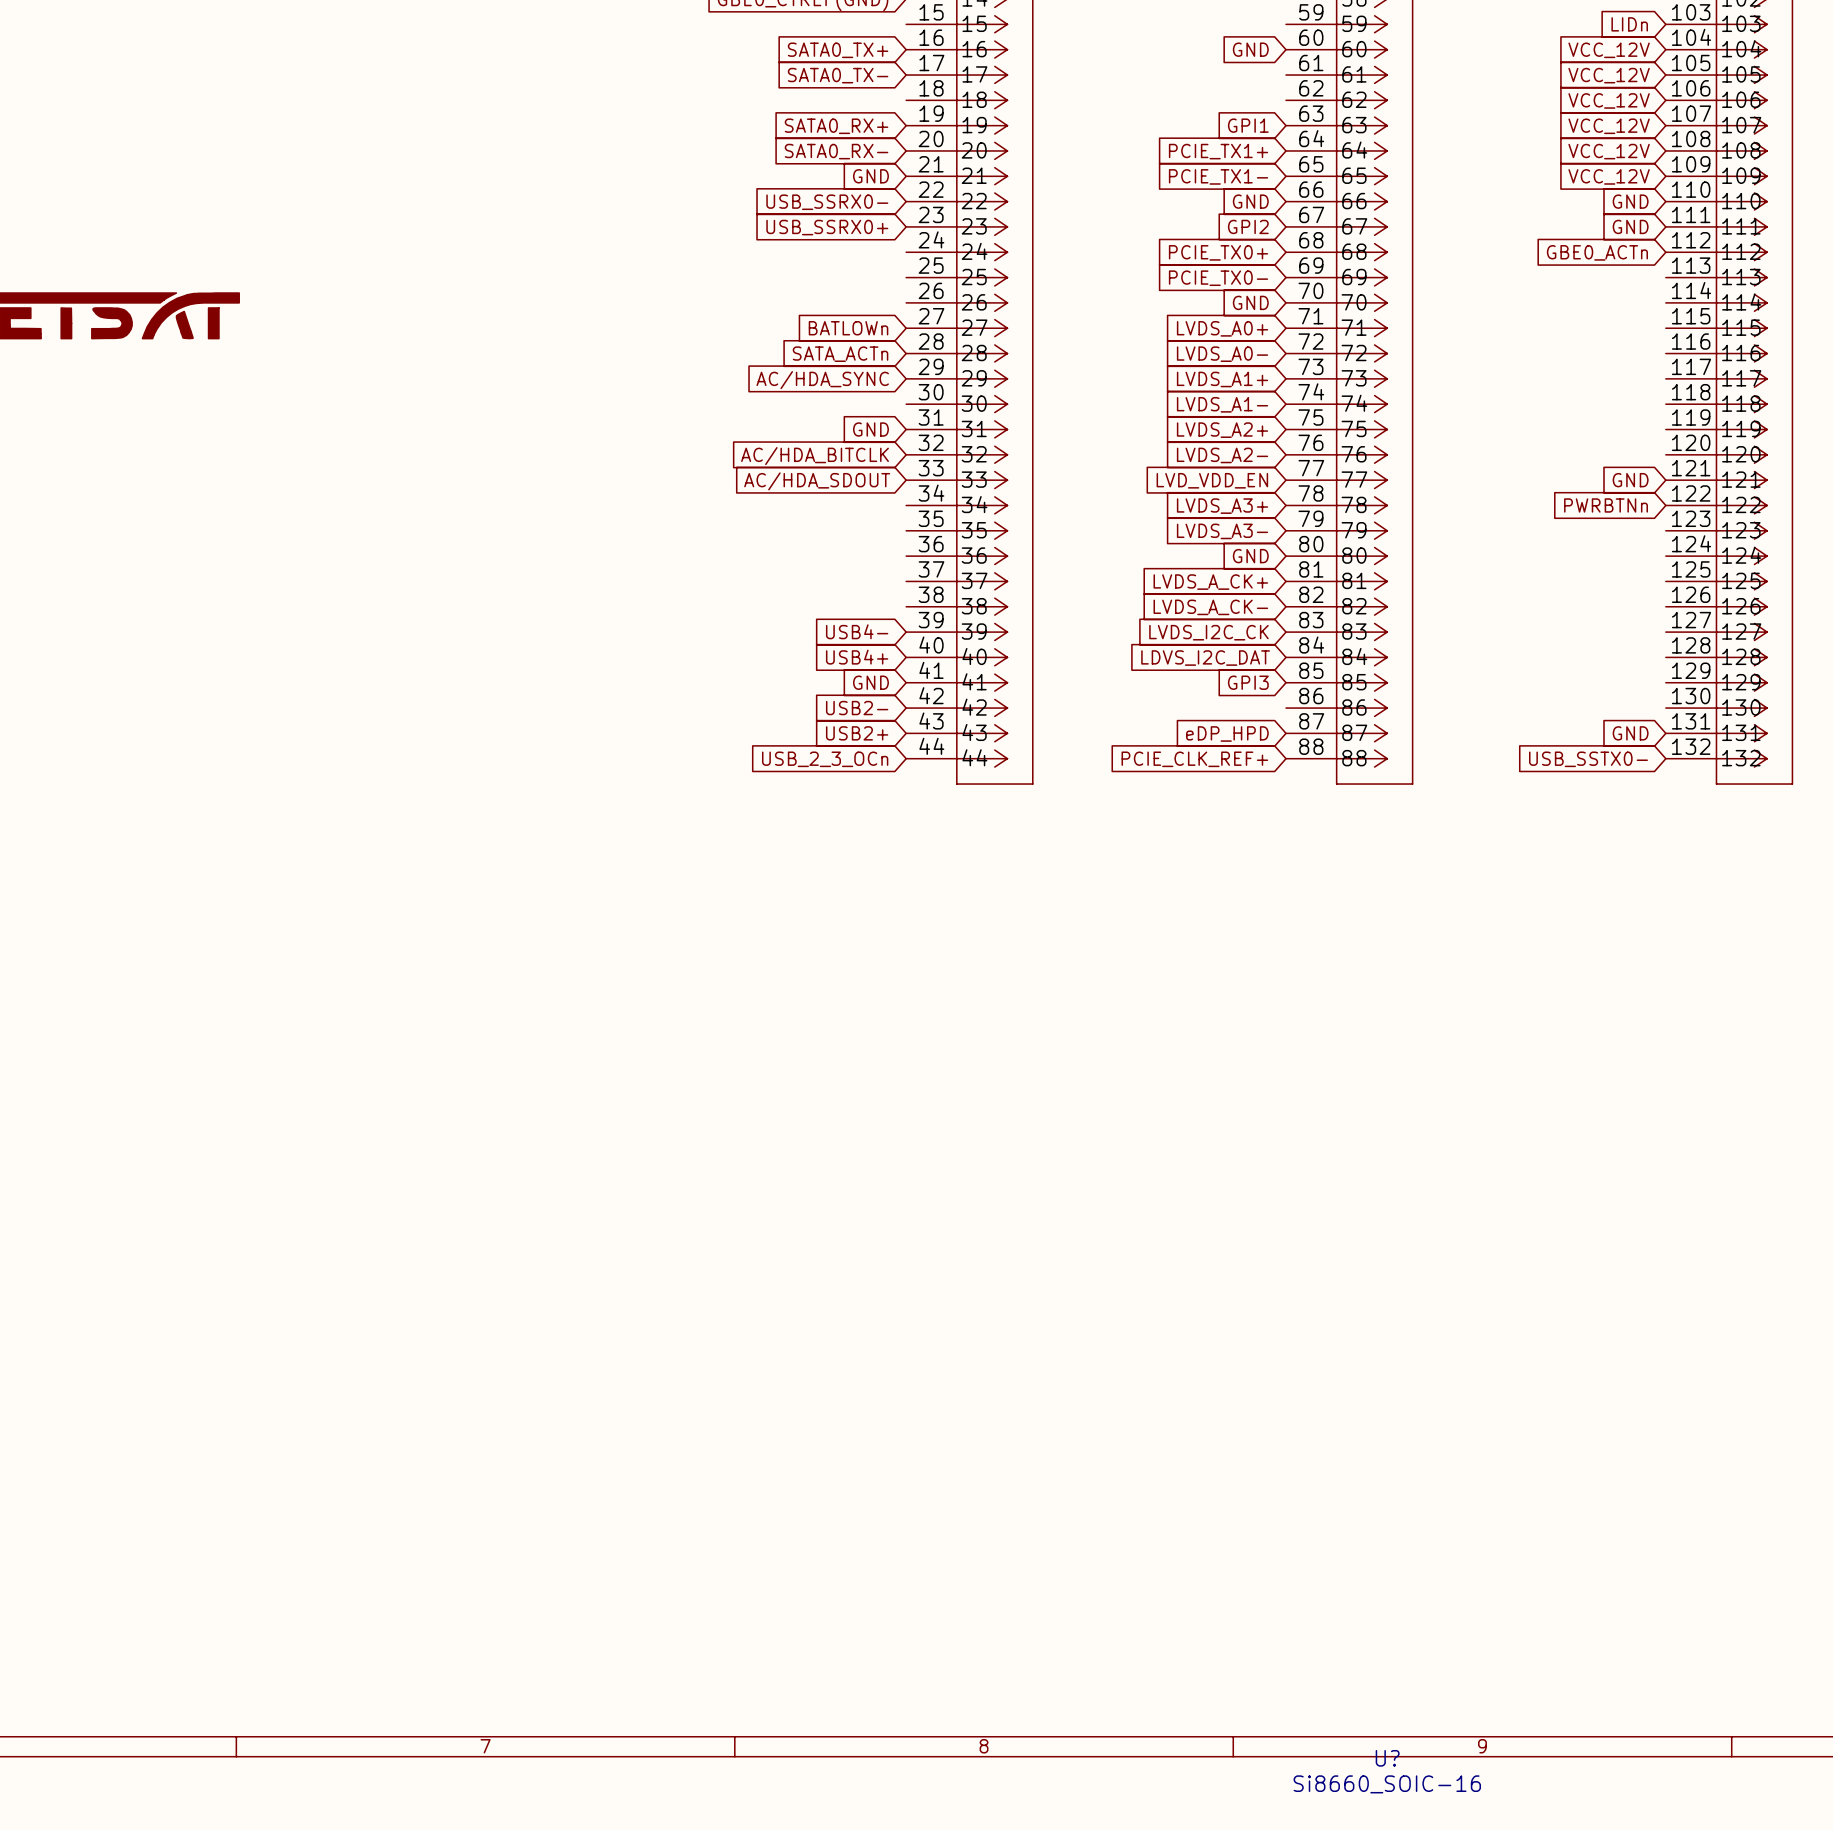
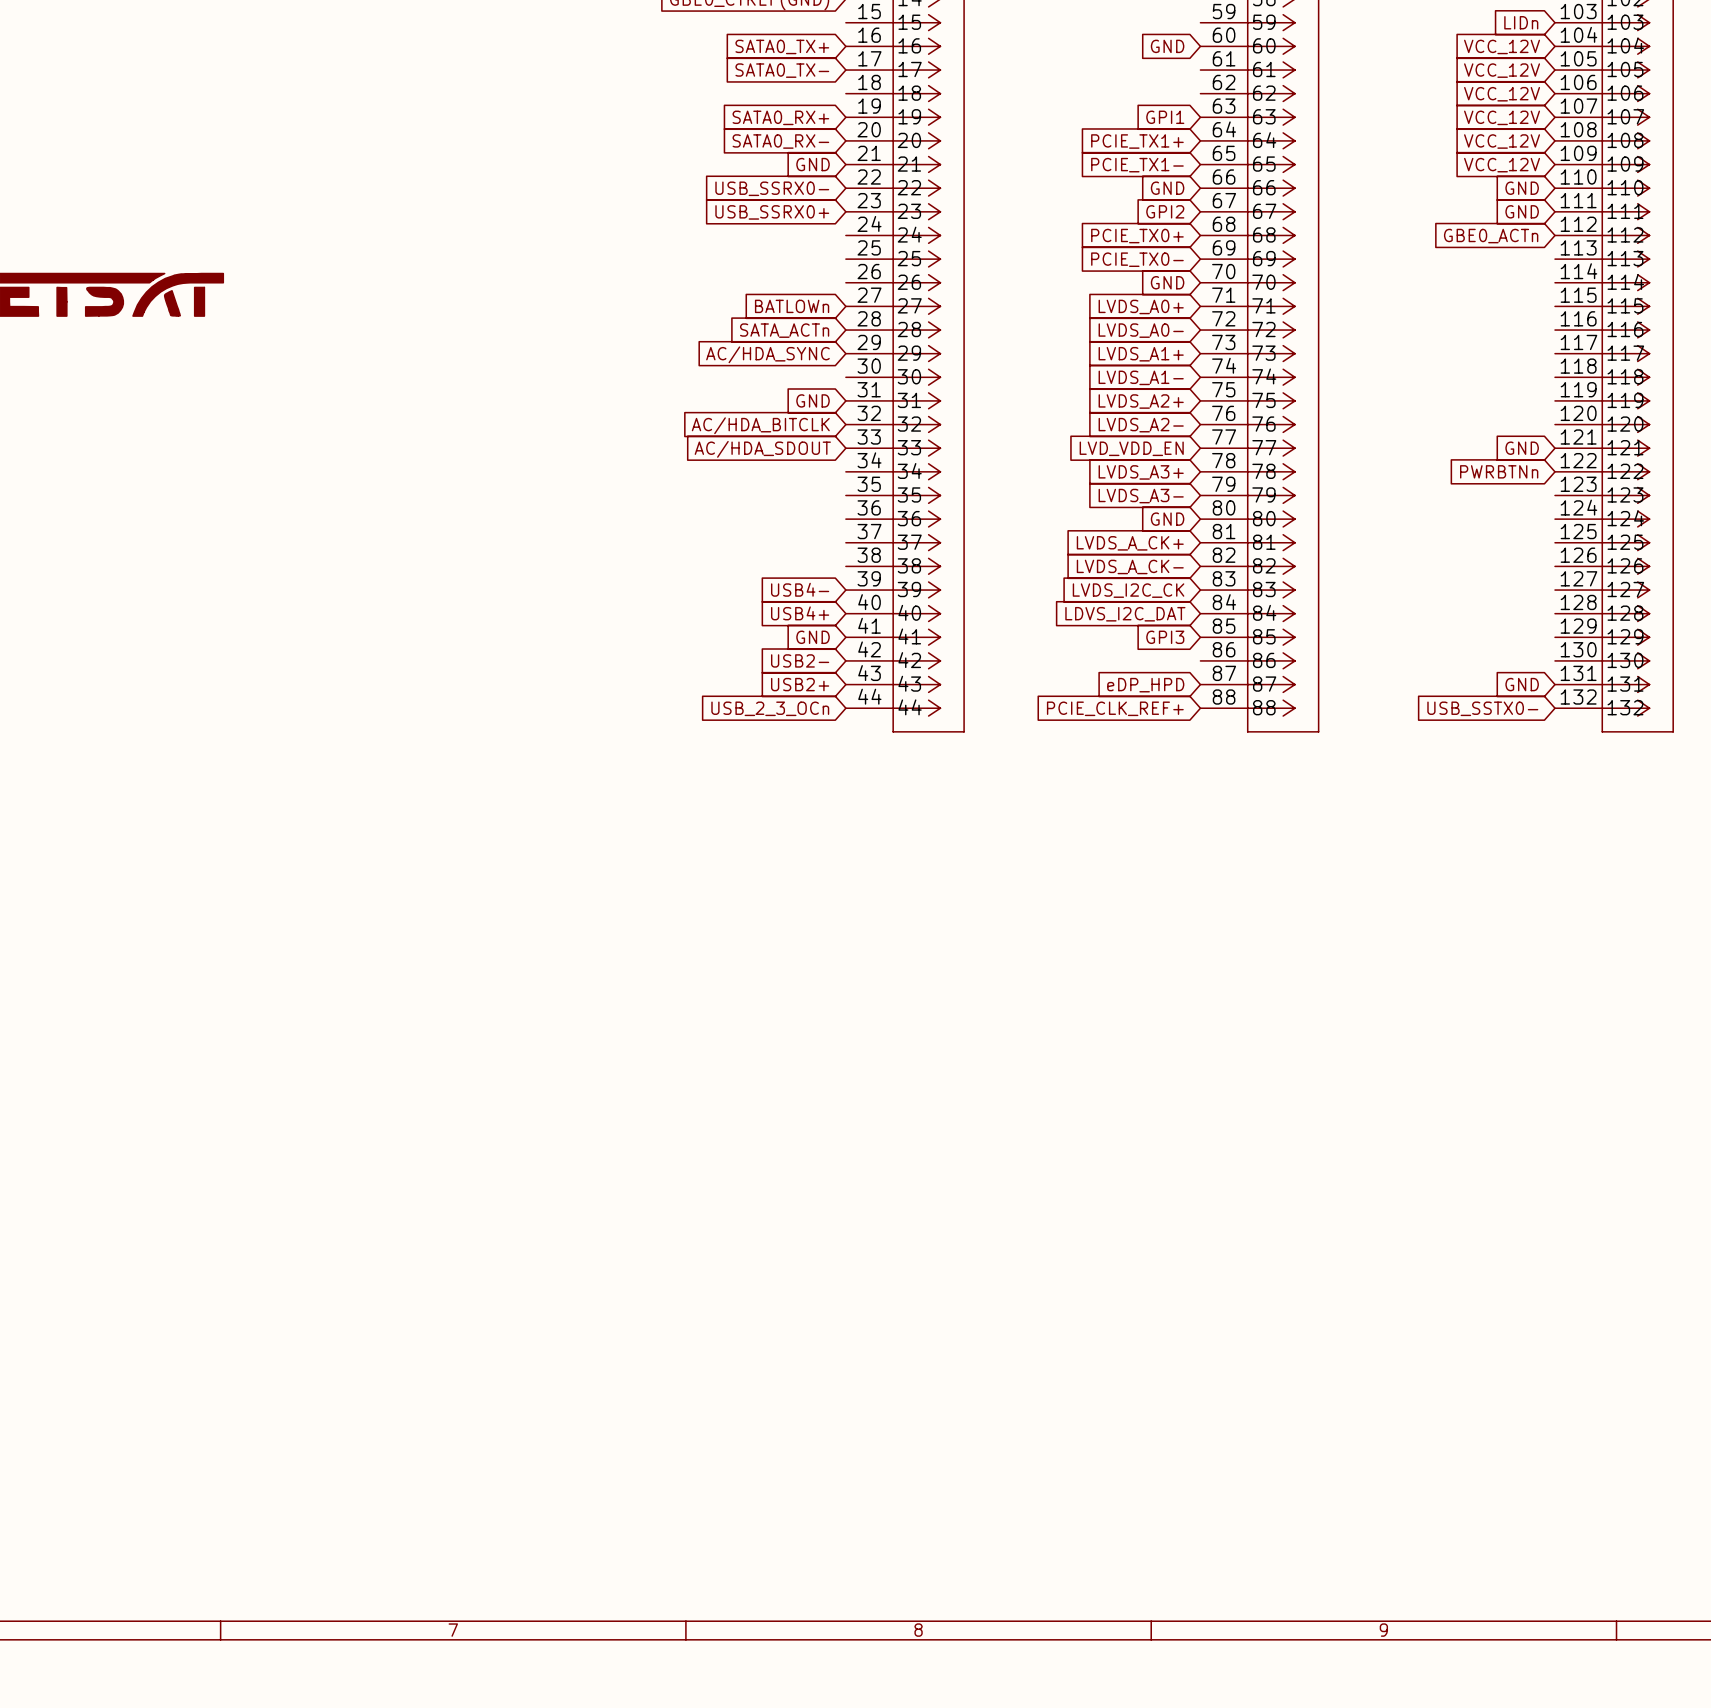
U? name: U? (1387, 1758) -> none
U? value: Si8660_SOIC-16 (1387, 1784) -> none

